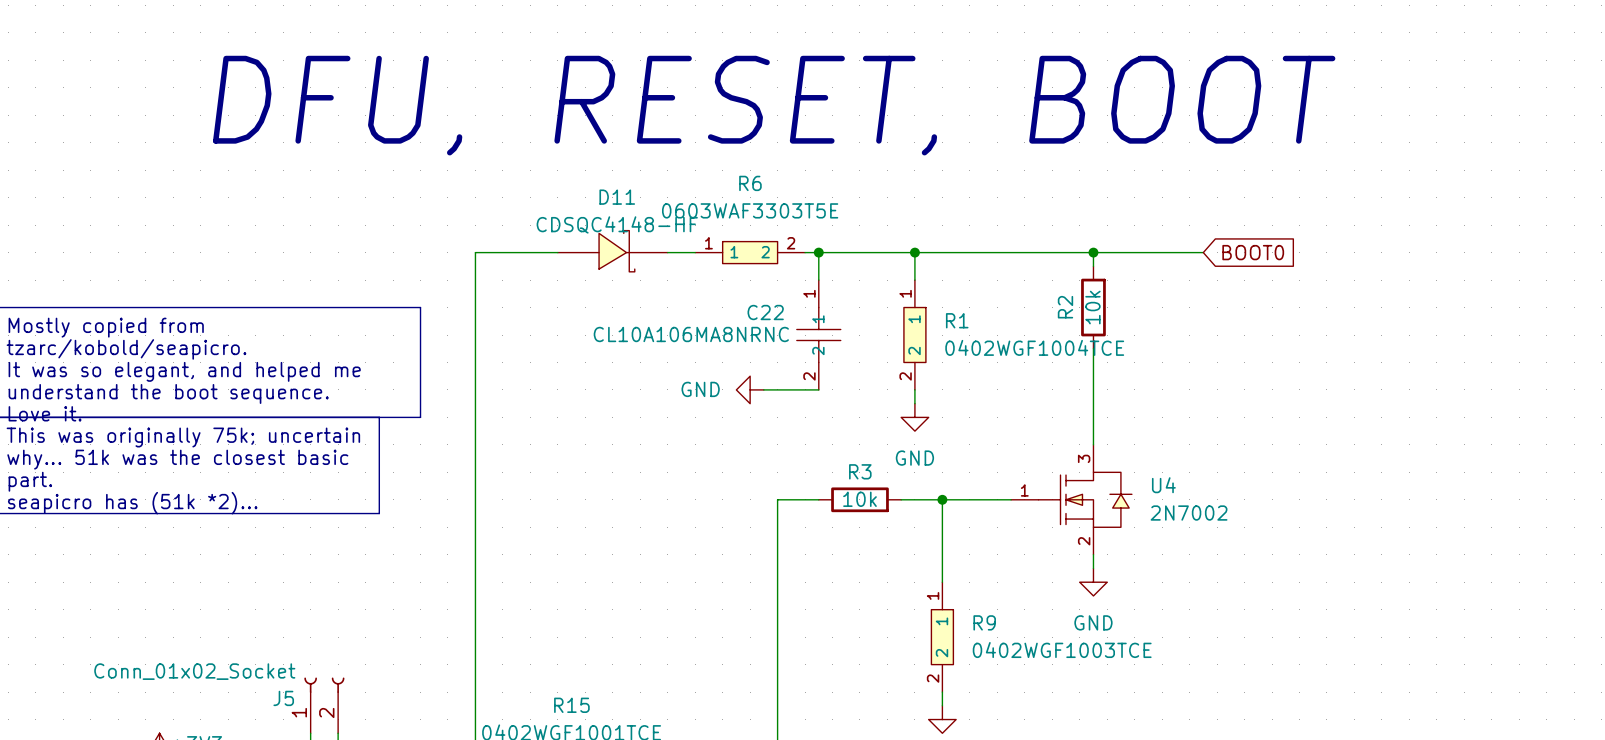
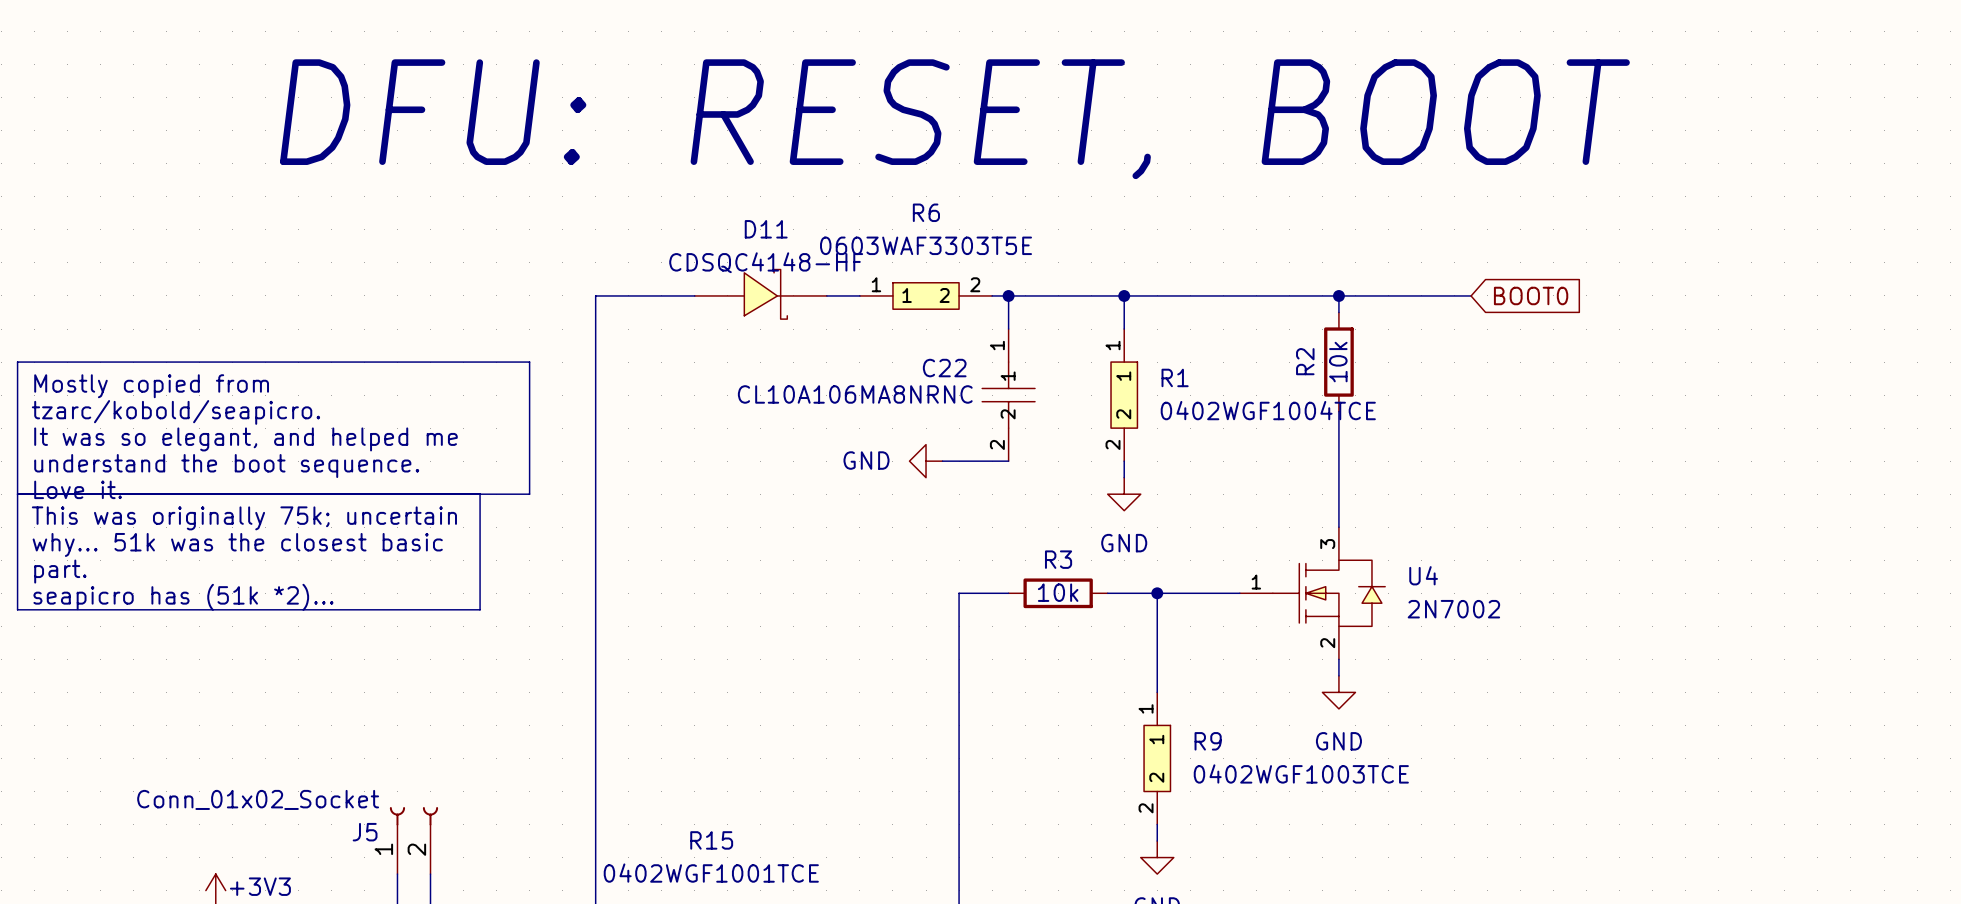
text: DFU, RESET, BOOT (774, 105) -> DFU: RESET, BOOT (954, 119)

